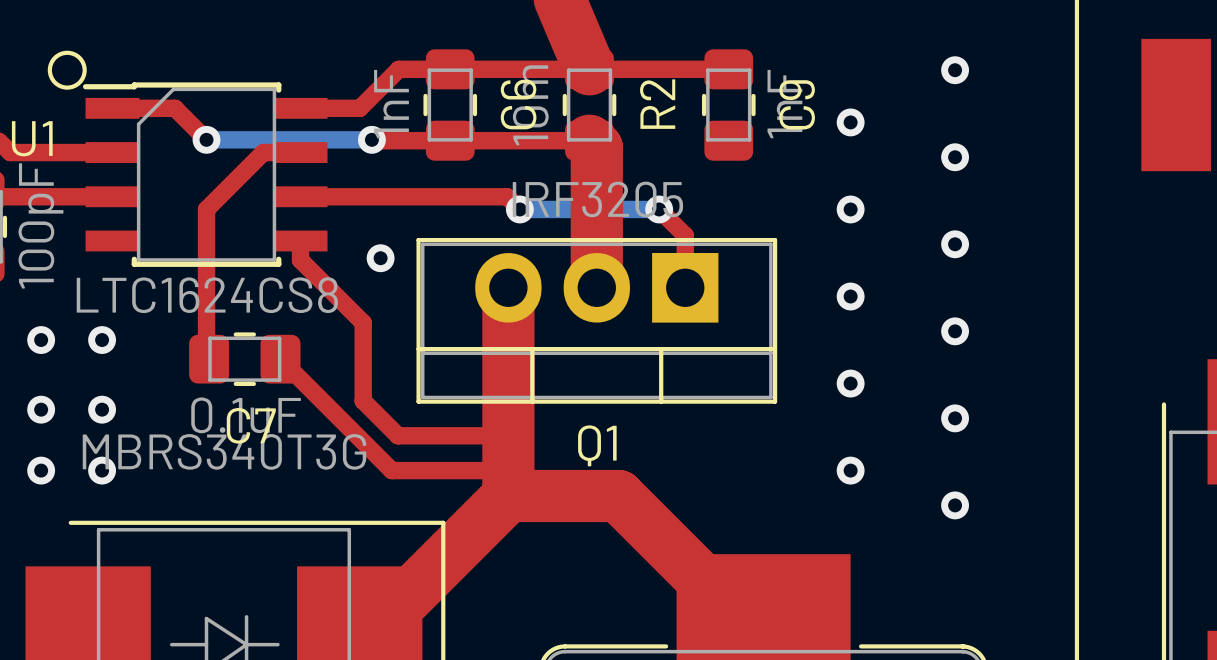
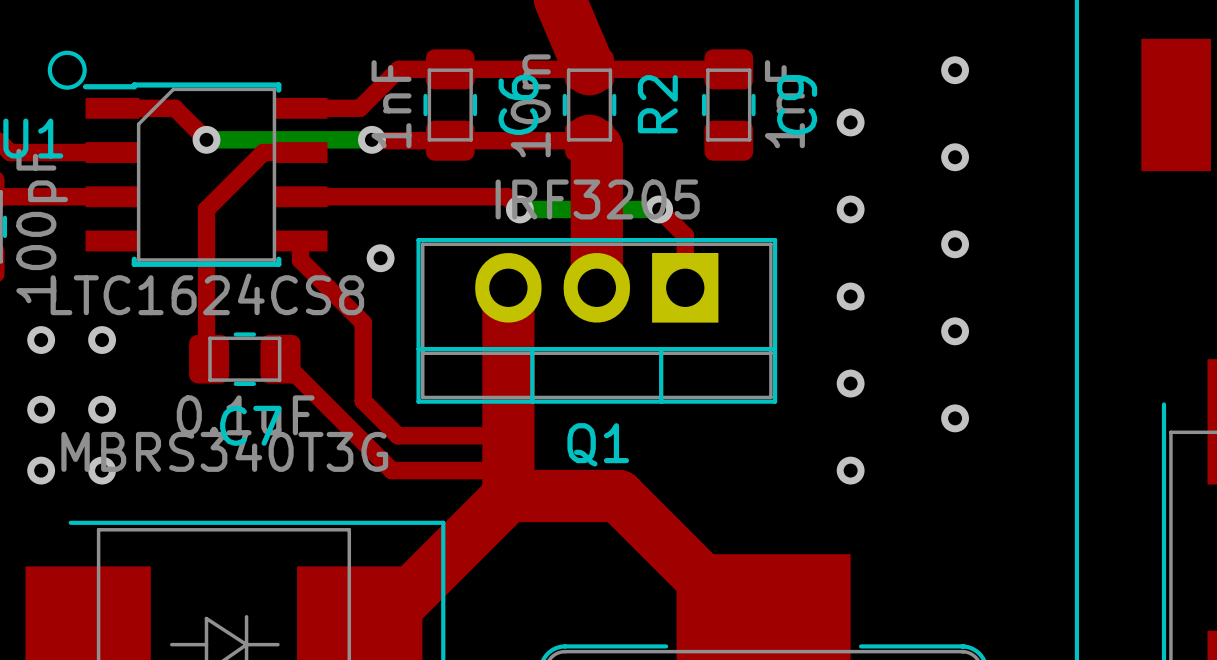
via: (955, 505) -> none

